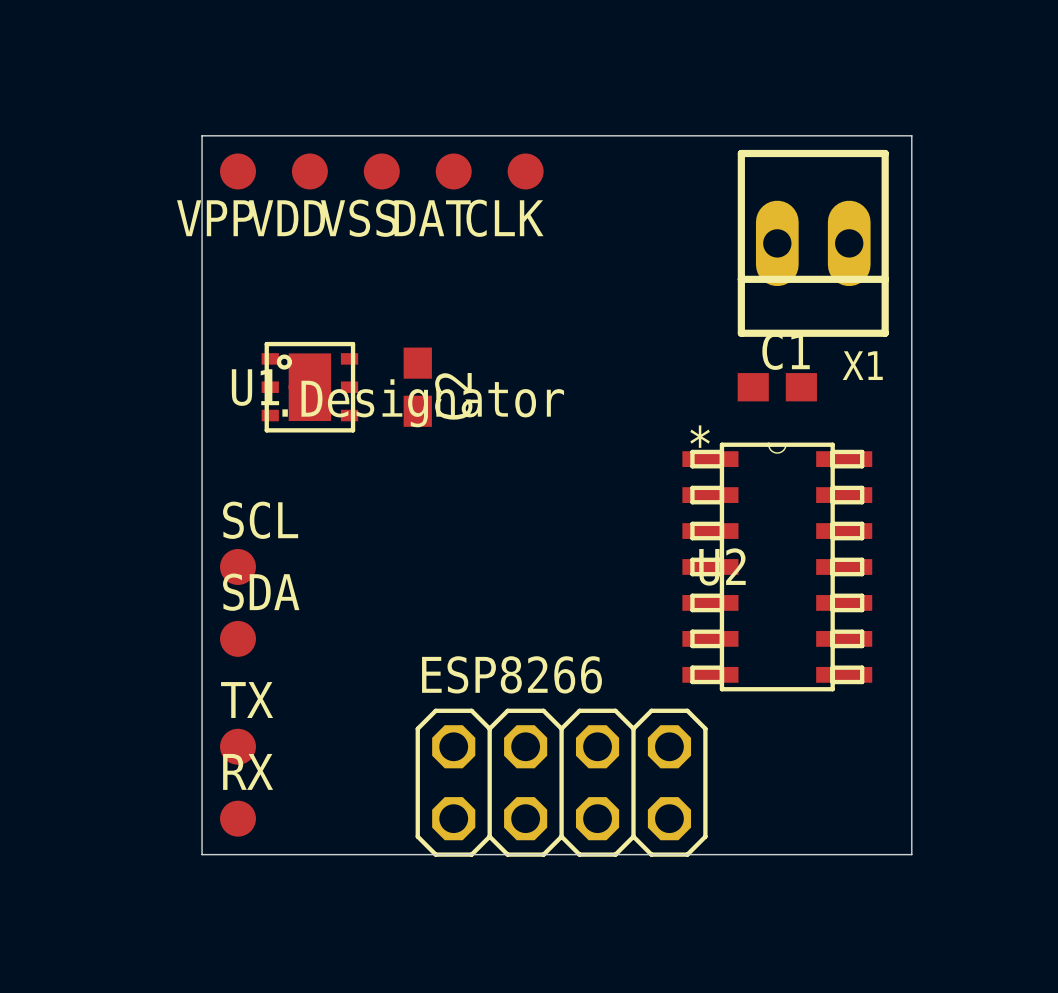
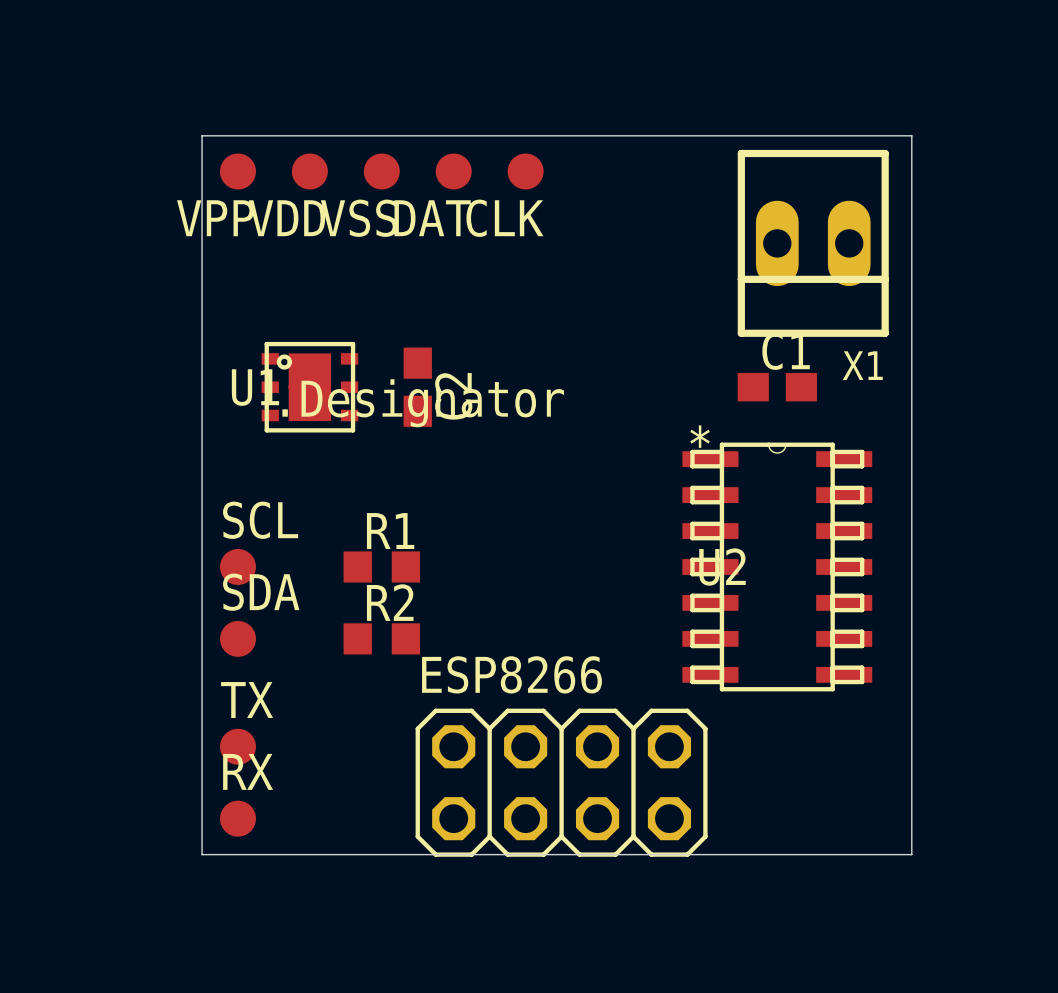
R1: none -> (381, 566)
R2: none -> (381, 638)

